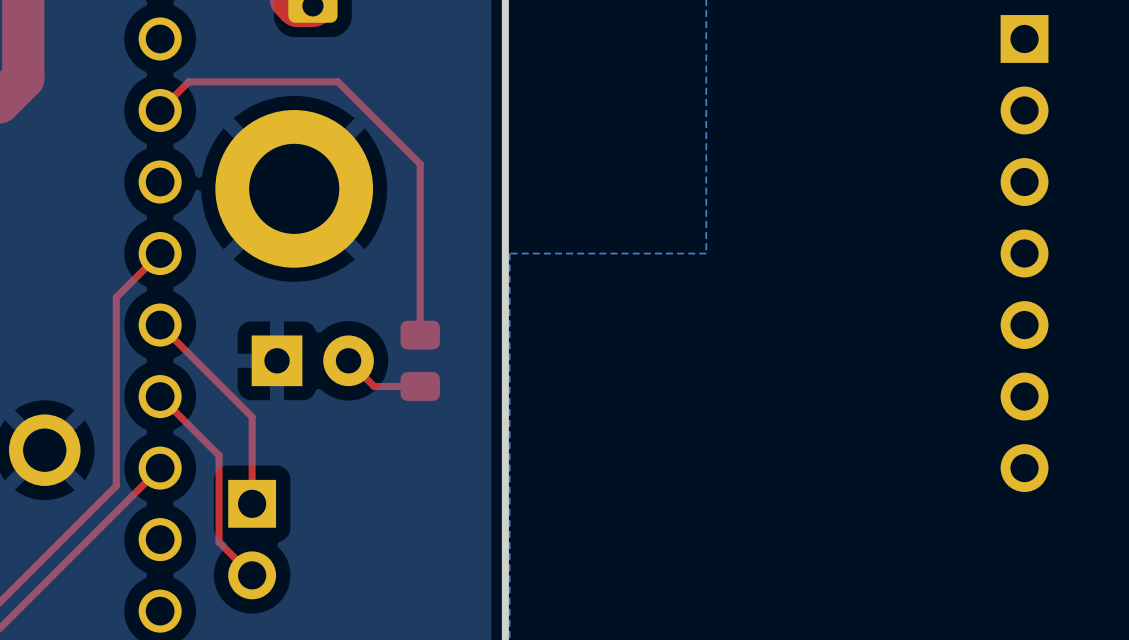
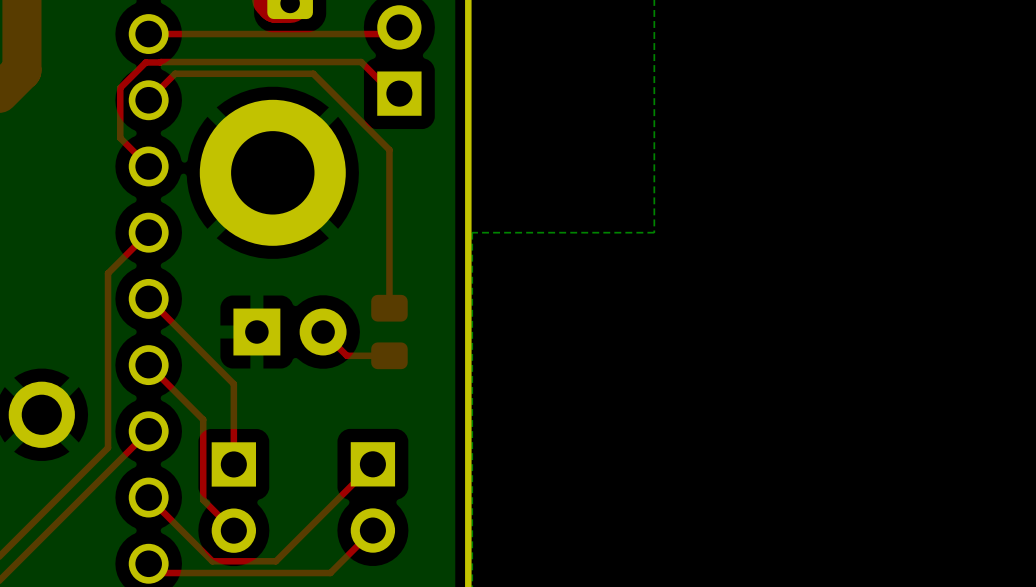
top track: none -> (392, 27) (386, 34) (148, 34)
part: none -> (399, 60)
top track: none -> (392, 93) (361, 62) (145, 62) (120, 88) (120, 138) (148, 166)
part: (1024, 253) -> none
top track: none -> (372, 464) (275, 561) (212, 561) (148, 497)
part: none -> (372, 497)
top track: none -> (372, 530) (330, 573) (157, 573) (148, 563)

